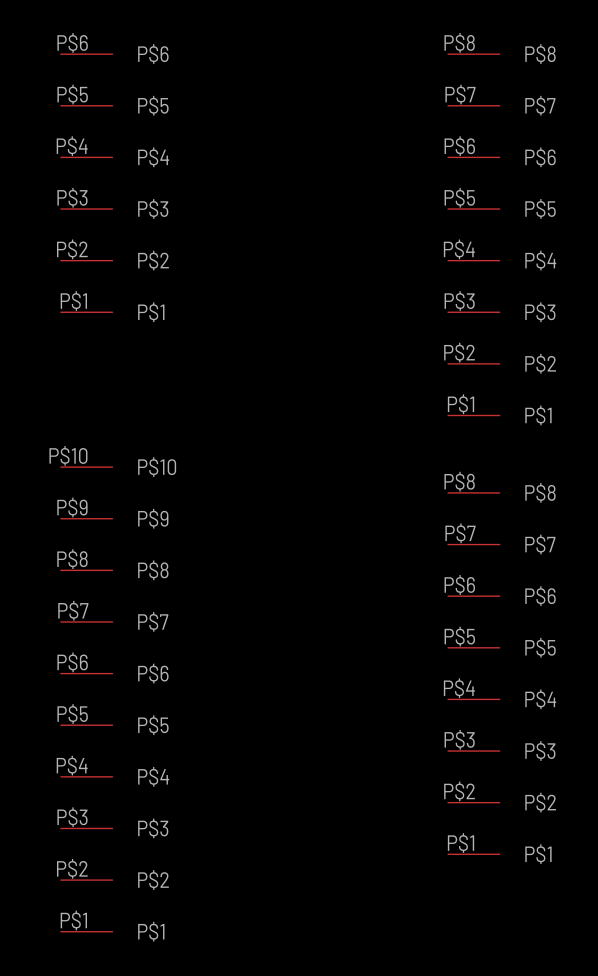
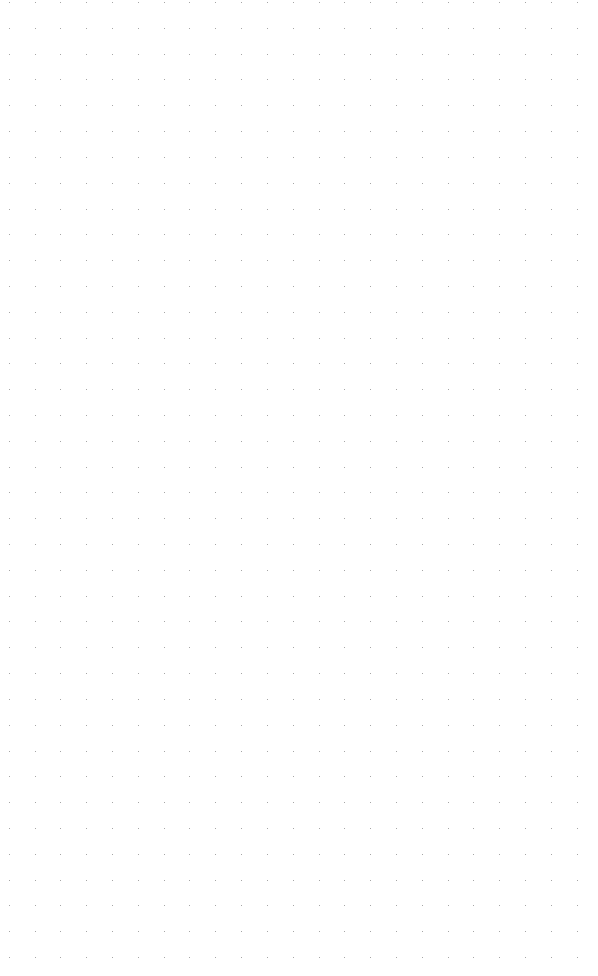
part: (86, 183) -> none
part: (473, 234) -> none
part: (473, 673) -> none
part: (86, 699) -> none

